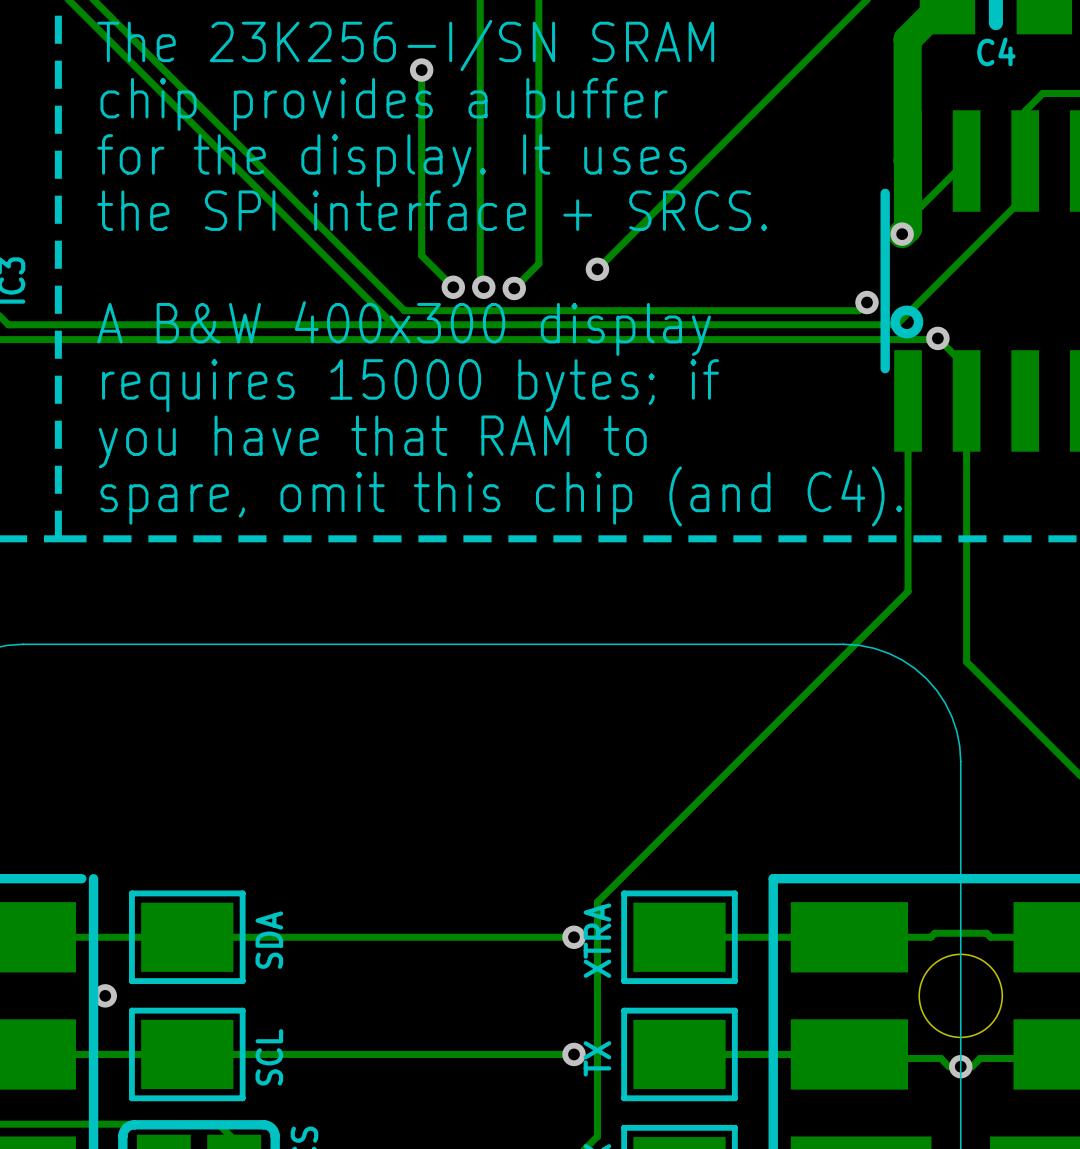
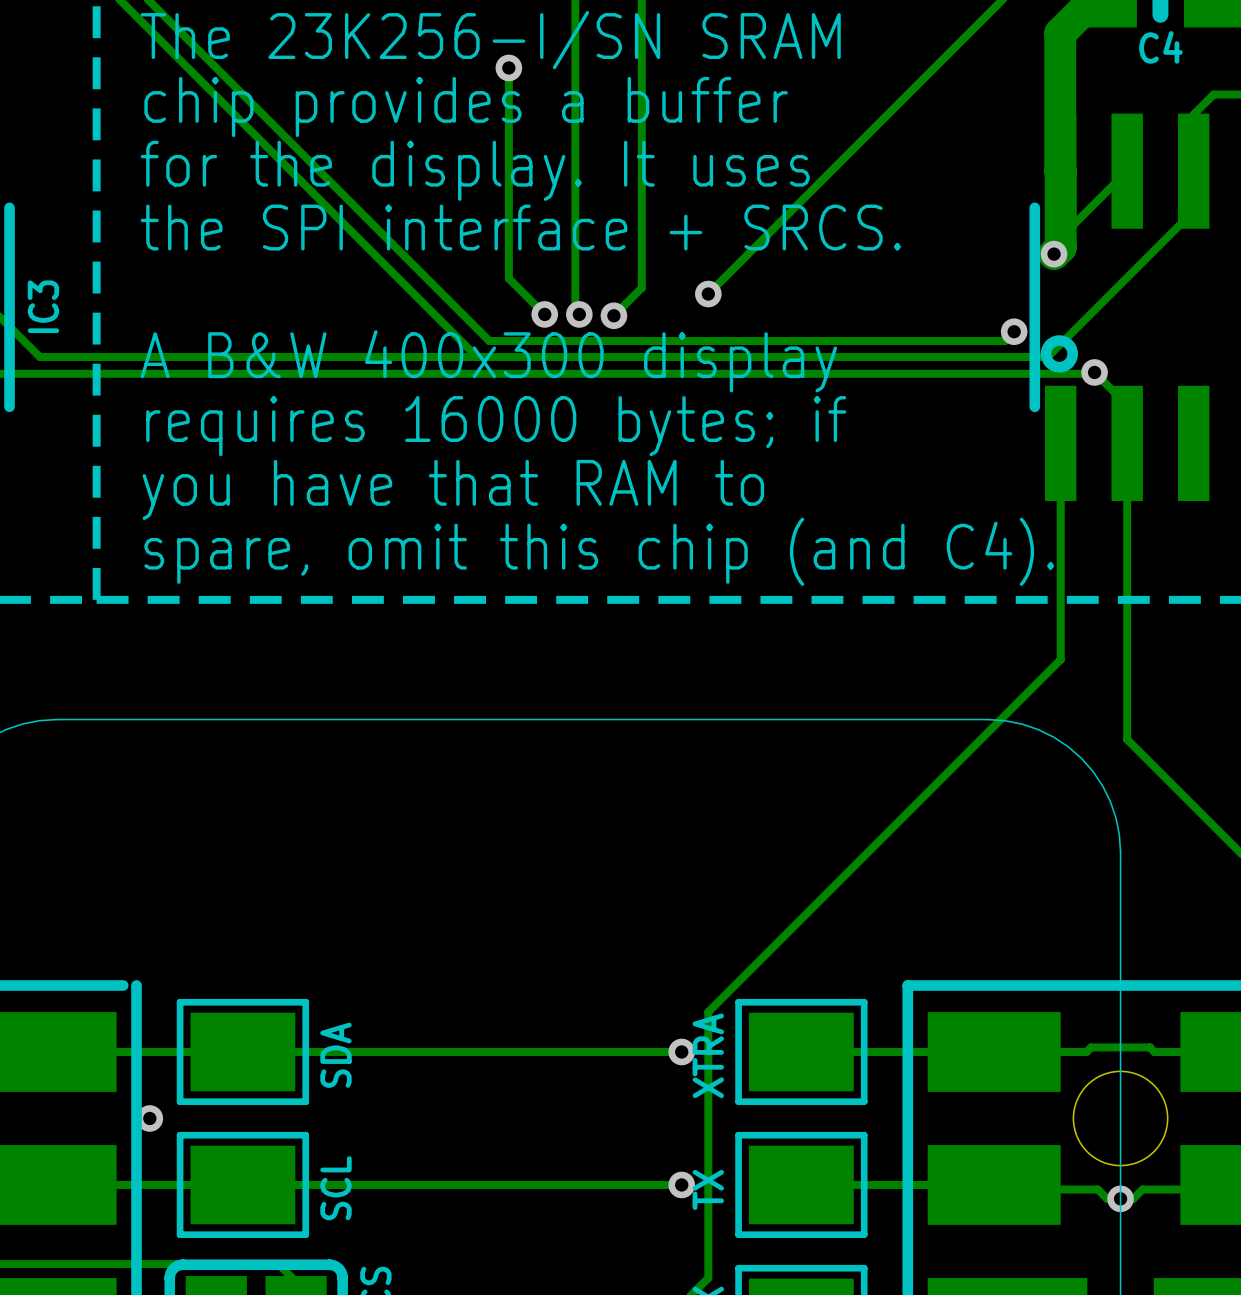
text: requires 15000 bytes; if (410, 385) -> requires 16000 bytes; if (496, 426)

